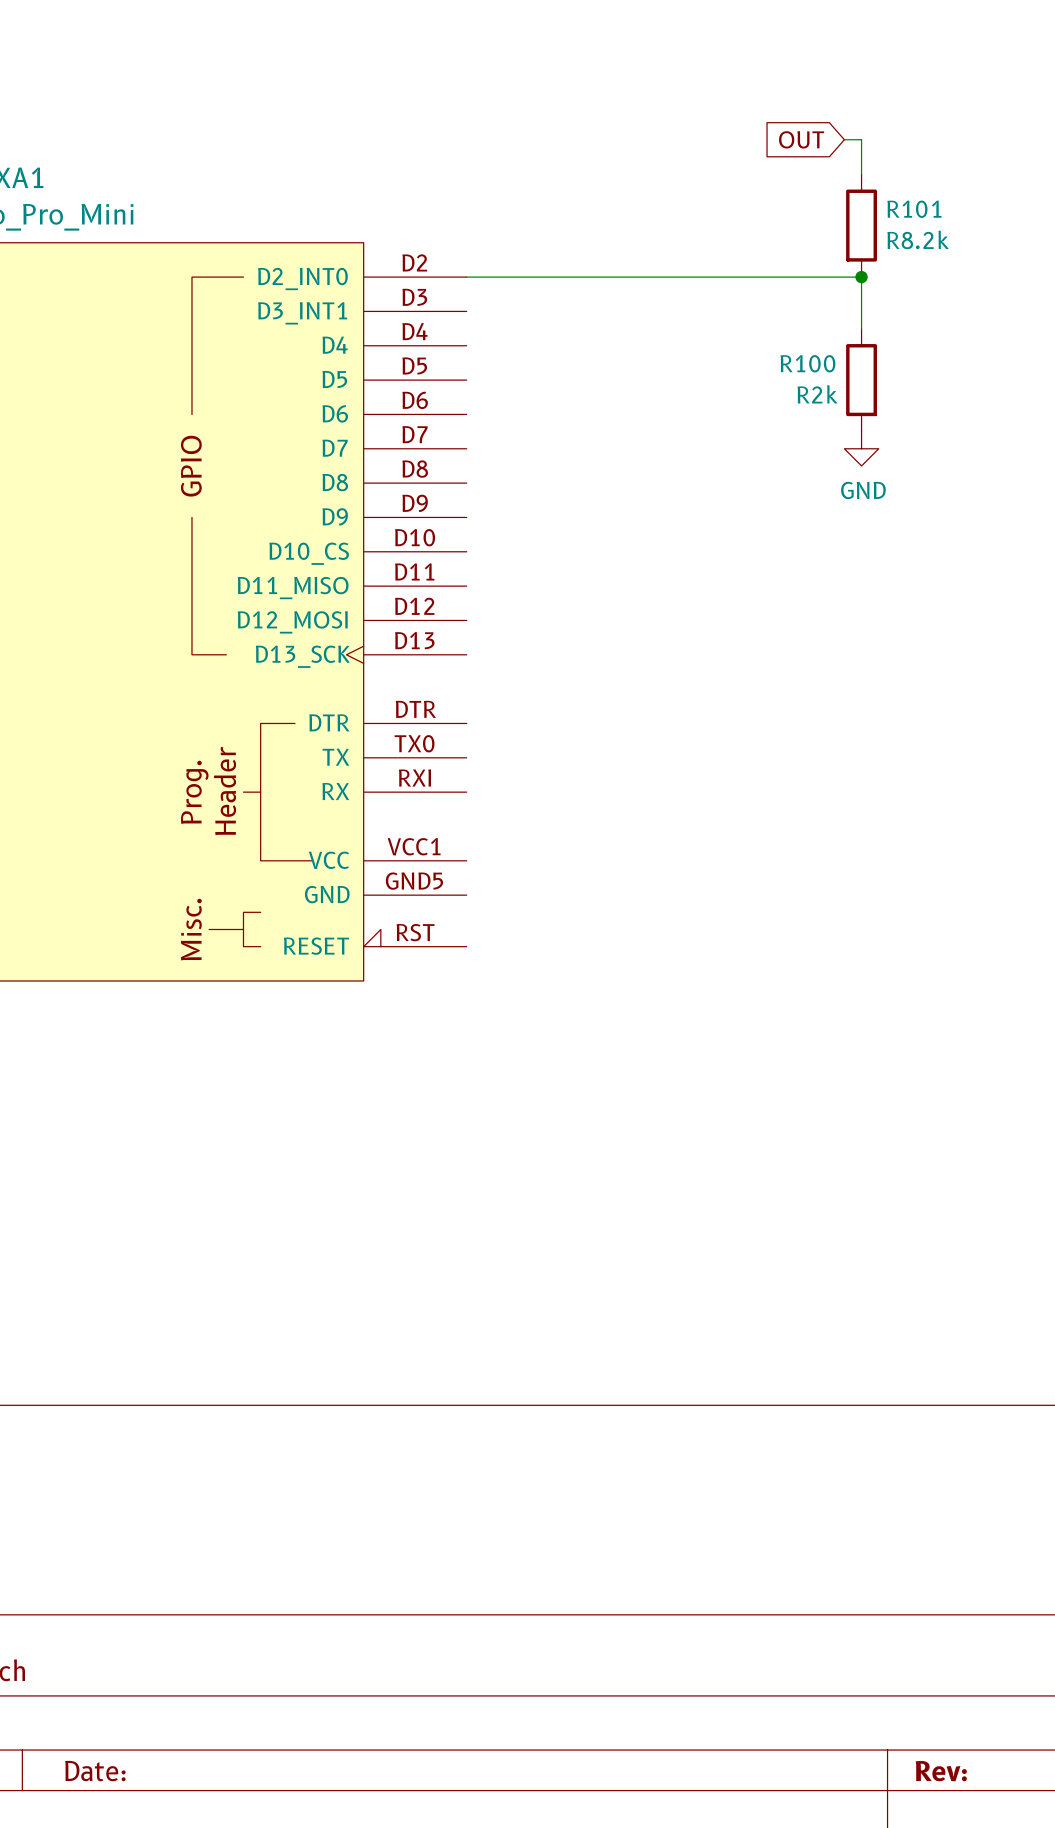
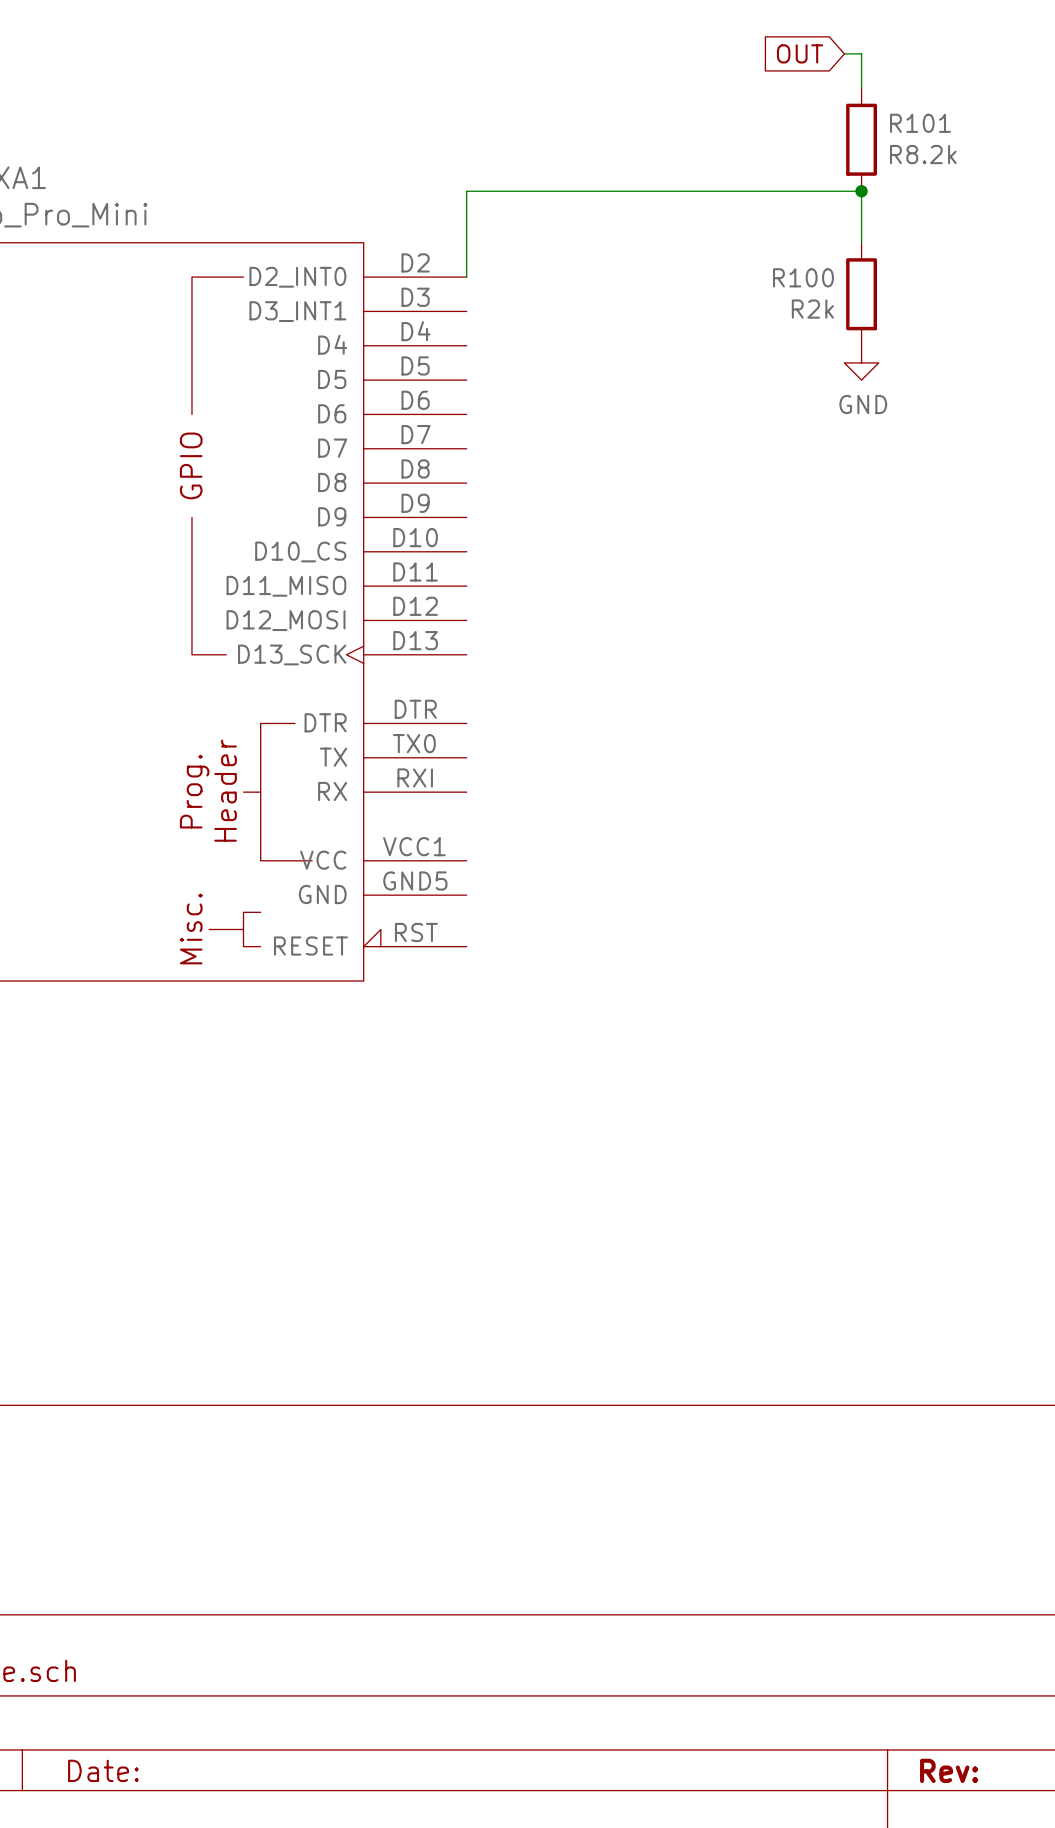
global label position: OUT (801, 139) -> OUT (800, 53)
wire: (844, 139) (861, 139) (861, 174) -> (844, 53) (861, 53) (861, 88)
junction: none -> (861, 191)
R101 position: (861, 225) -> (861, 139)
wire: (466, 277) (861, 277) (861, 328) -> (466, 277) (466, 191) (861, 191) (861, 242)
junction: (861, 277) -> none
R100 position: (861, 380) -> (861, 294)
power symbol position: GND (861, 448) -> GND (861, 362)

